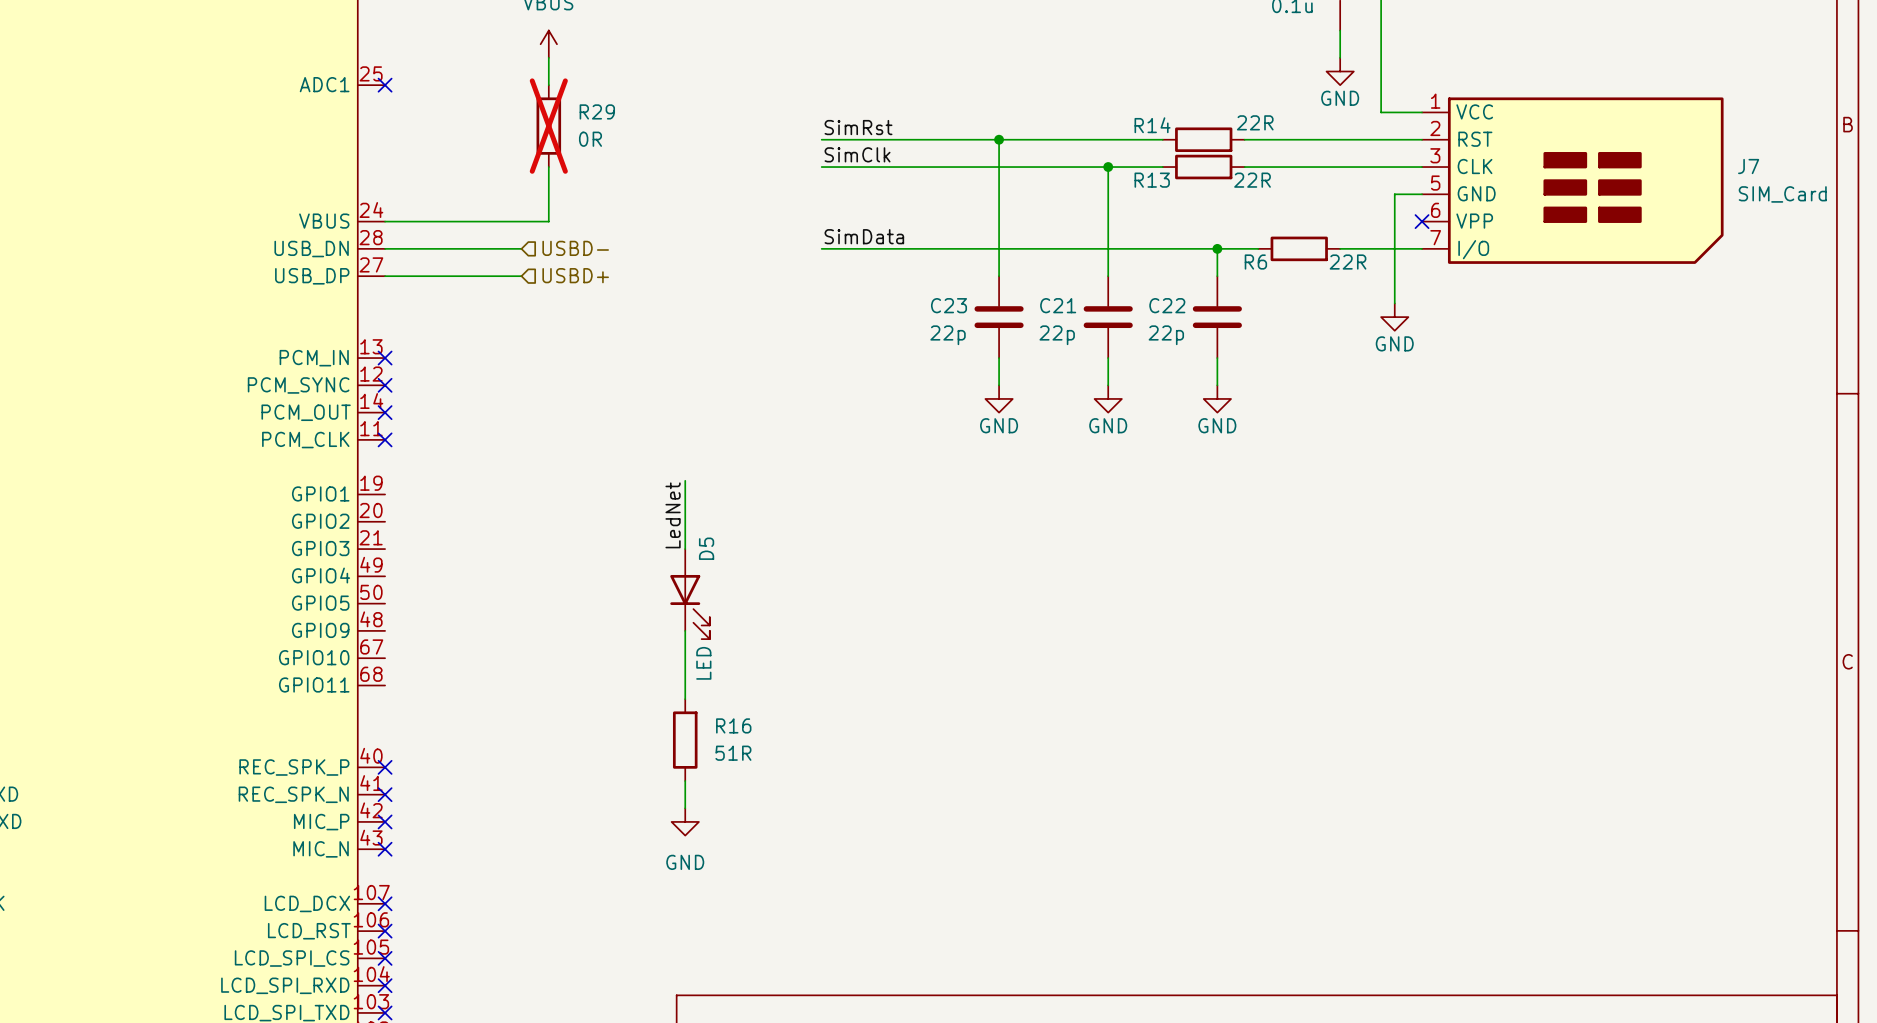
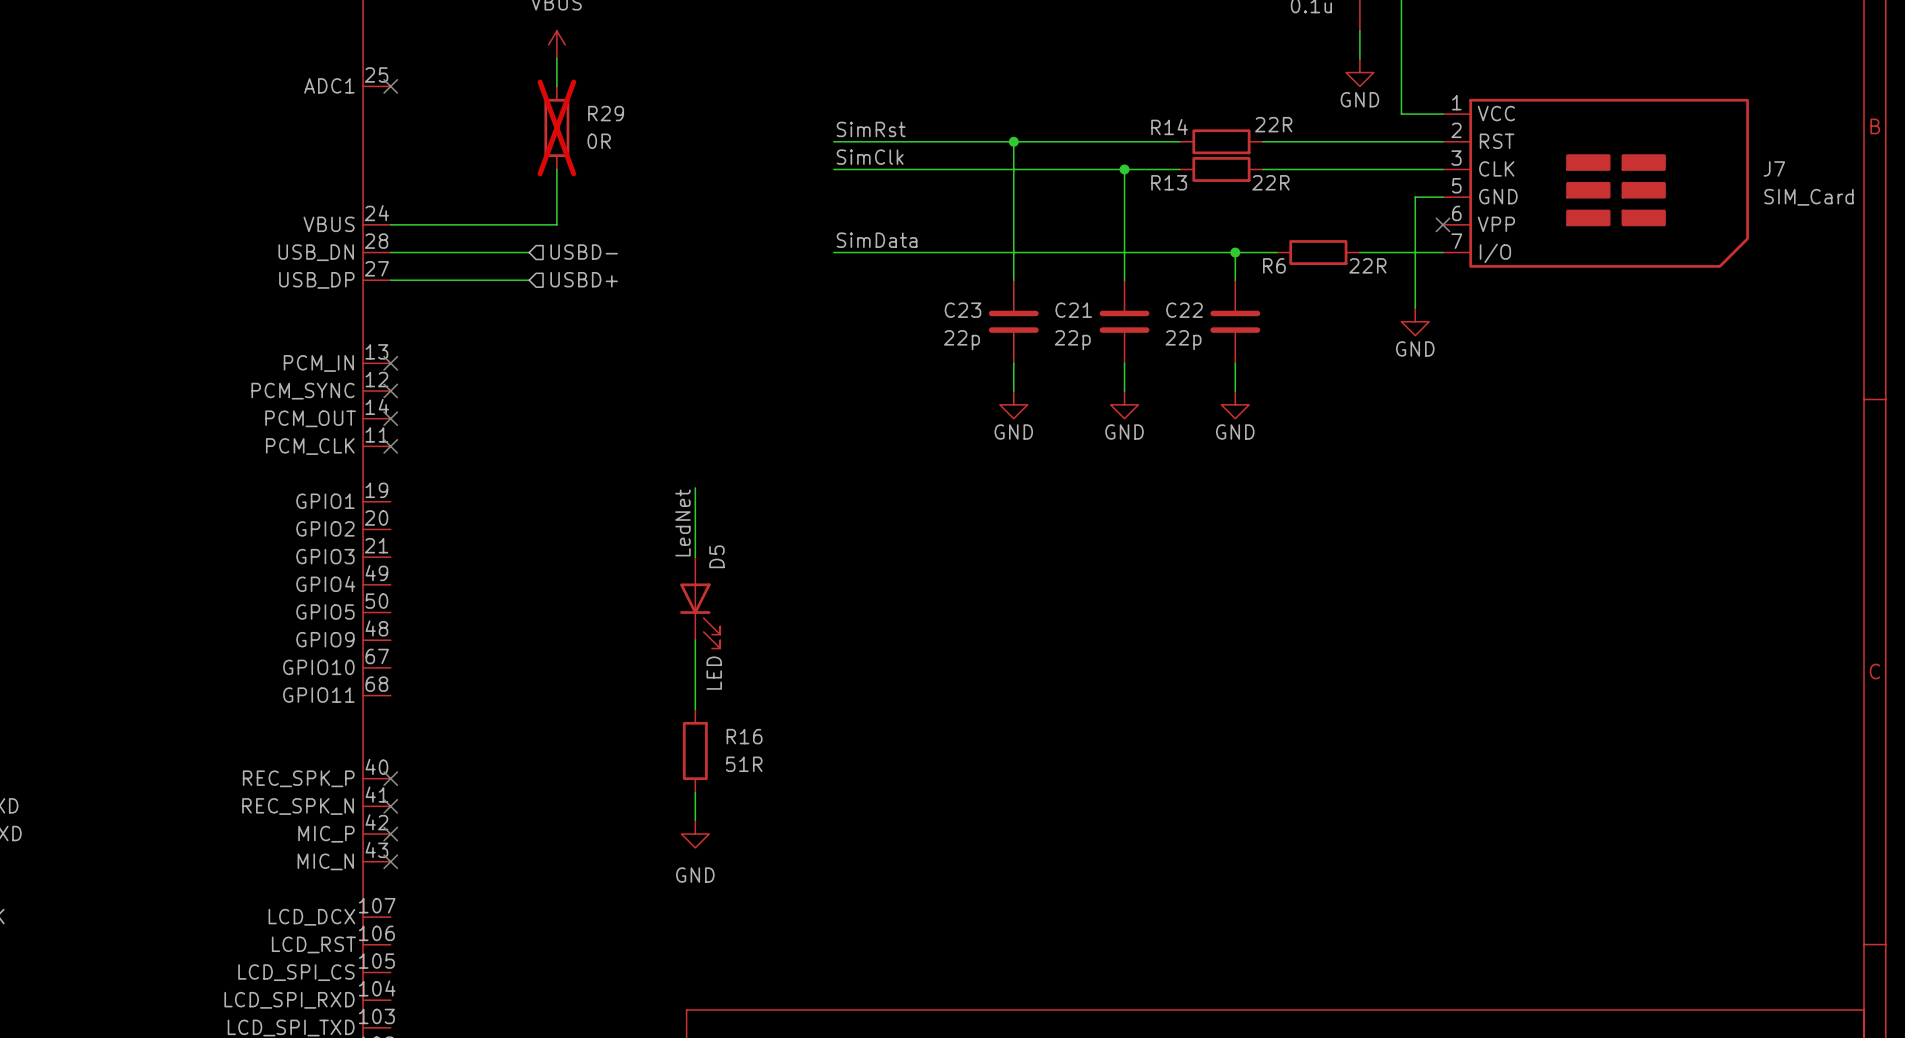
no-connect mark: (385, 903) -> none
no-connect mark: (385, 931) -> none
no-connect mark: (385, 958) -> none
no-connect mark: (385, 985) -> none
no-connect mark: (385, 1012) -> none

